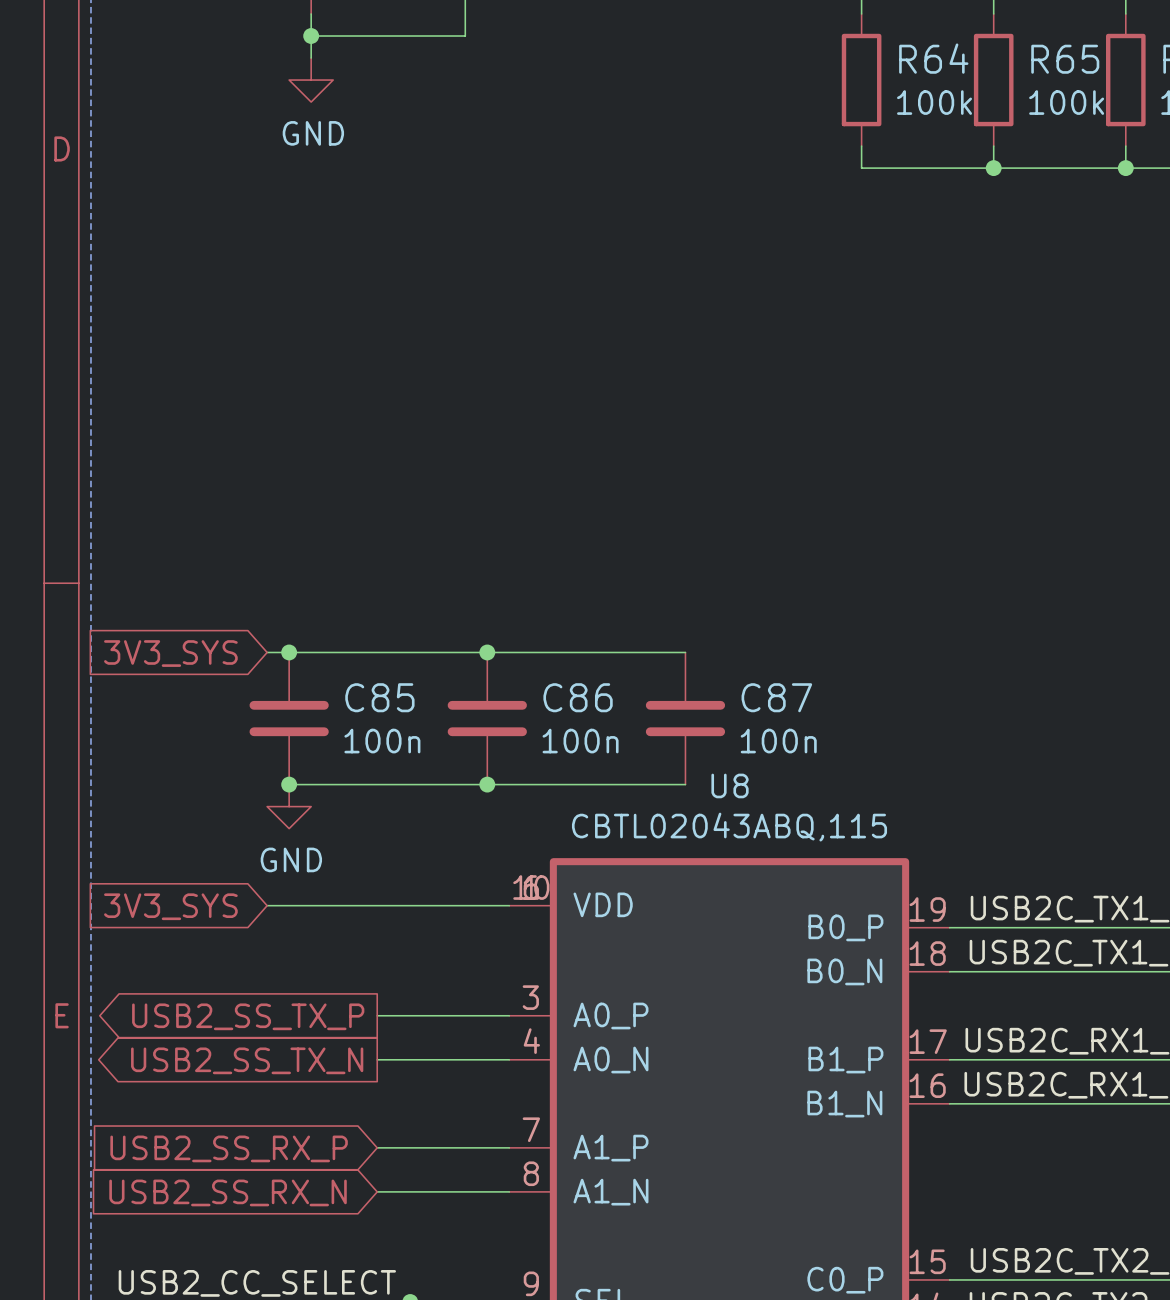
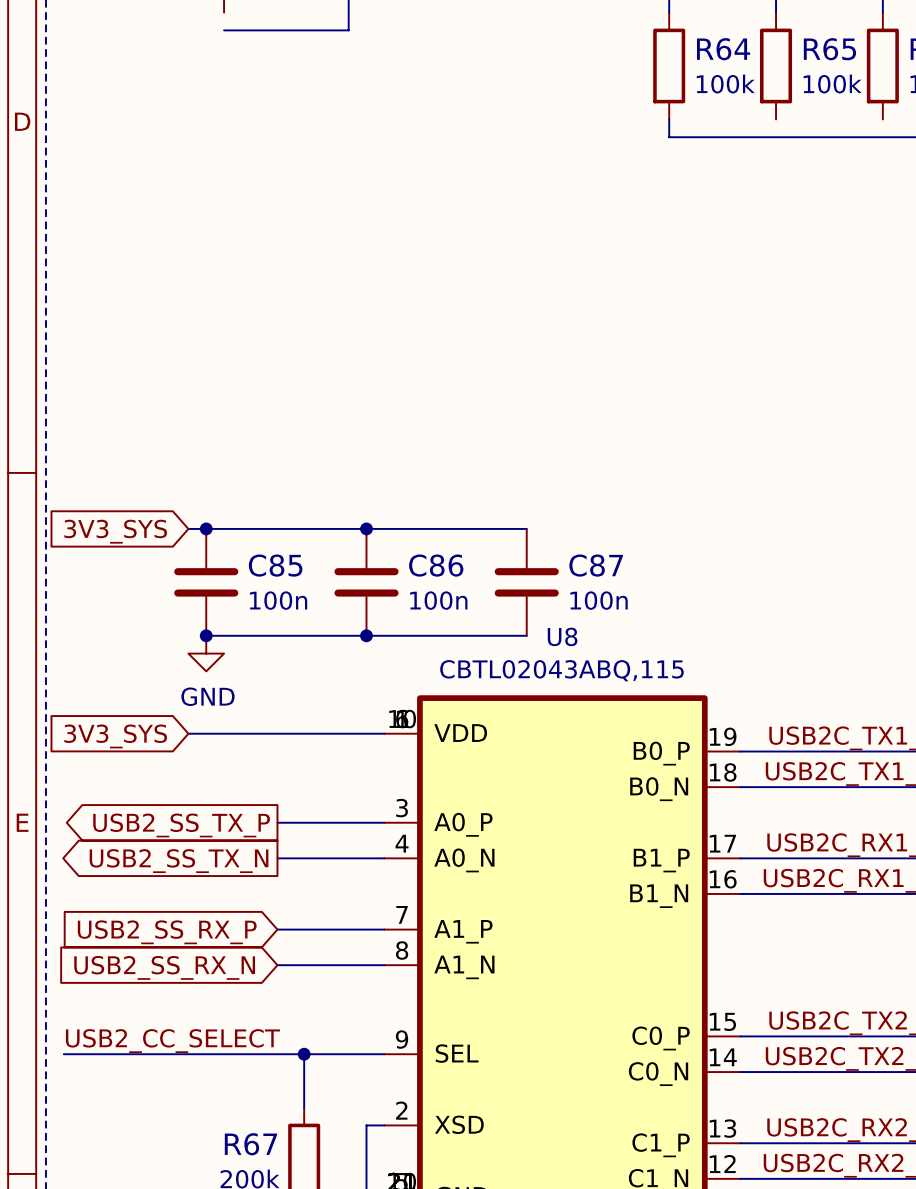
wire: (311, 13) (311, 58) -> none
junction: (311, 36) -> none
power symbol: GND (311, 80) -> none
wire: (993, 146) (993, 168) -> none
wire: (1125, 146) (1125, 168) -> none
junction: (993, 168) -> none
junction: (1125, 168) -> none

